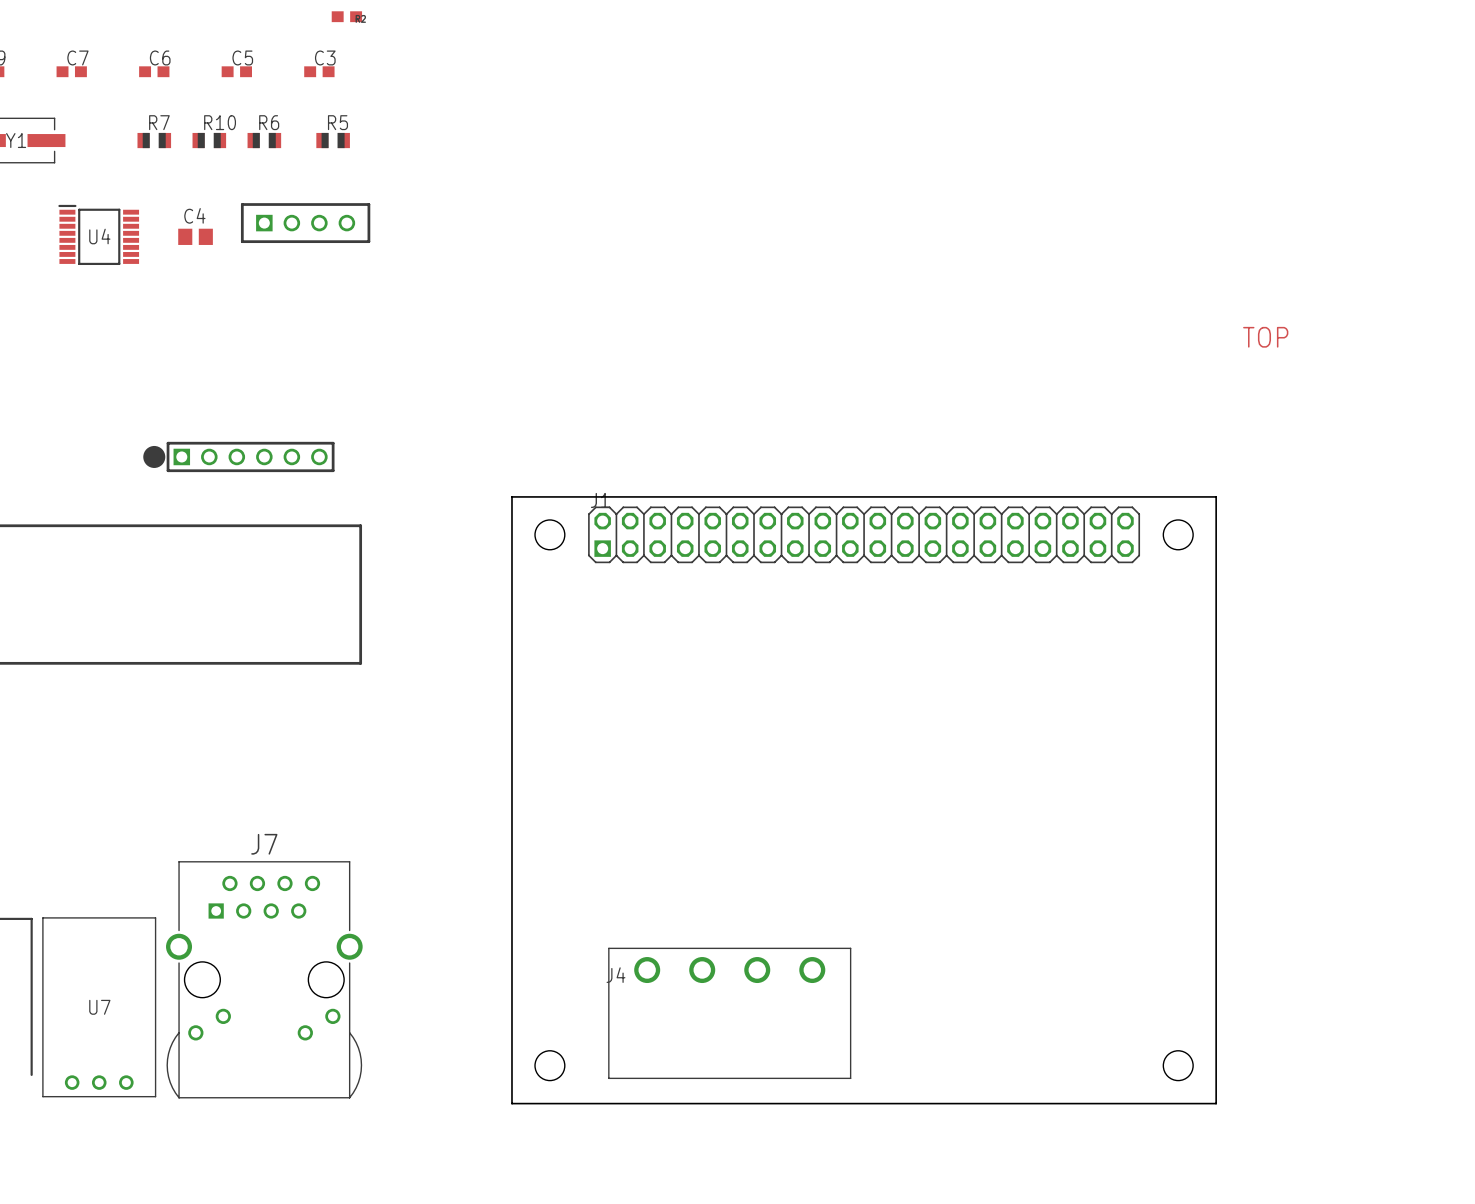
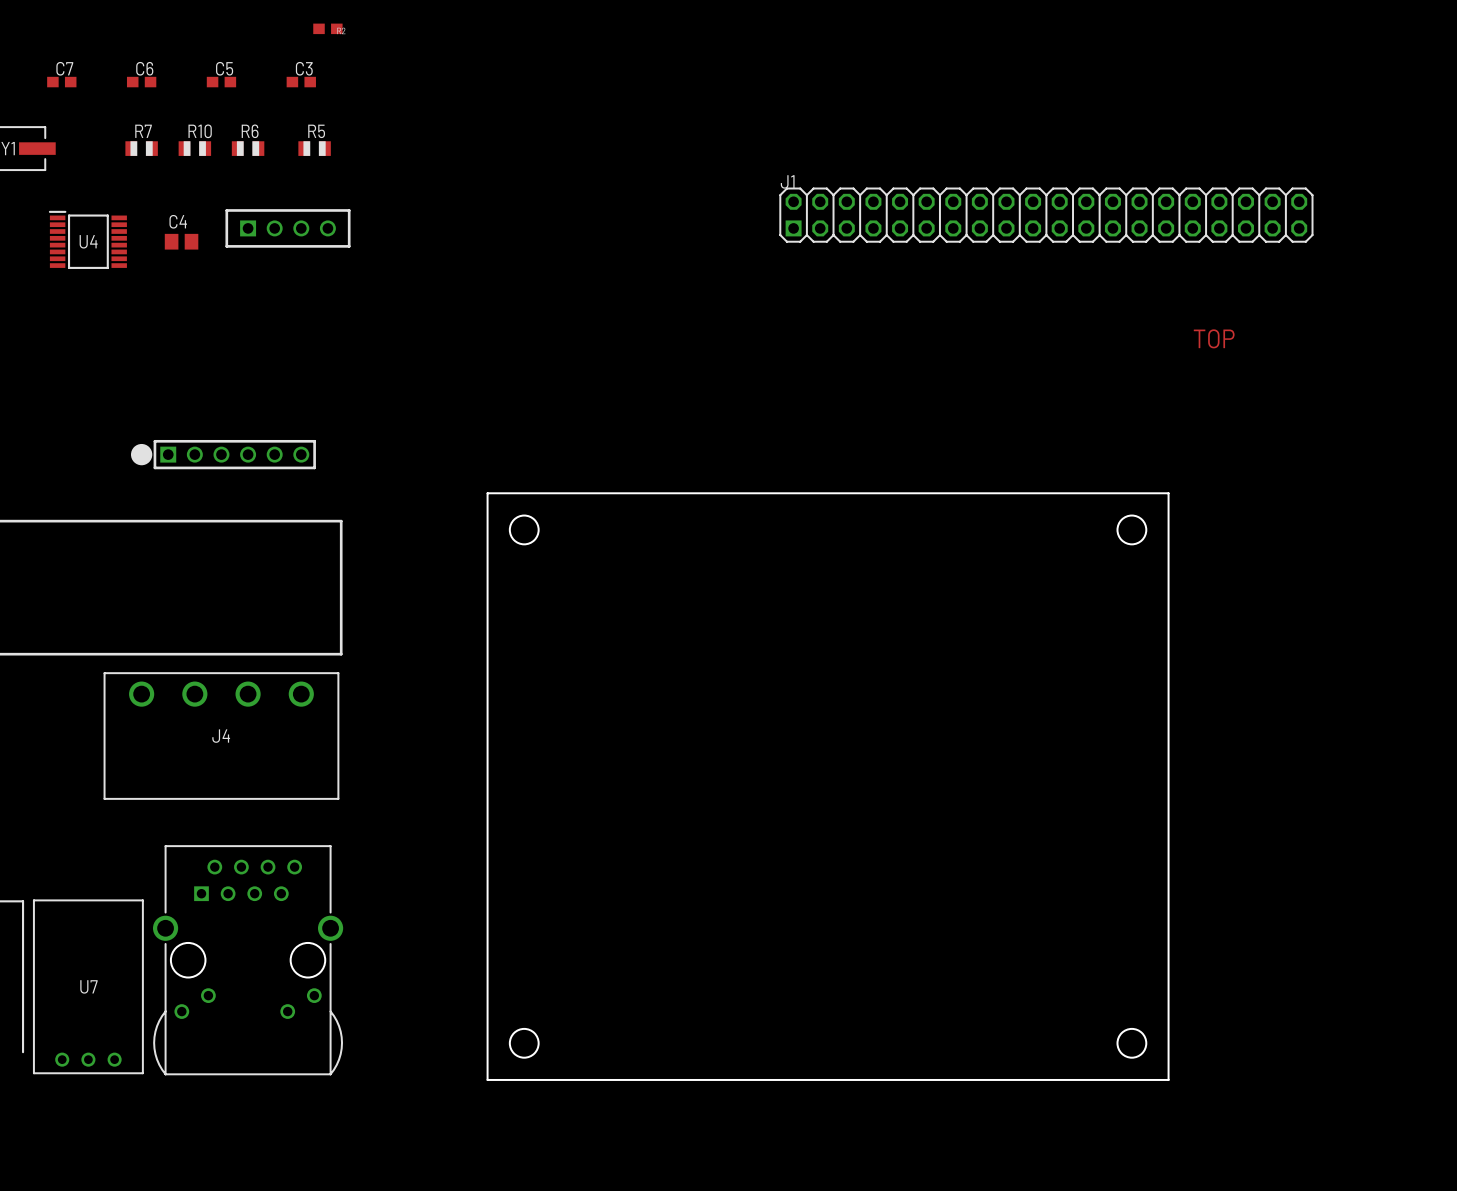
J1 position: (864, 534) -> (1046, 215)
J7 name: J7 (264, 844) -> none
J4 name position: J4 (615, 975) -> J4 (221, 736)
J4 position: (729, 1013) -> (221, 736)

